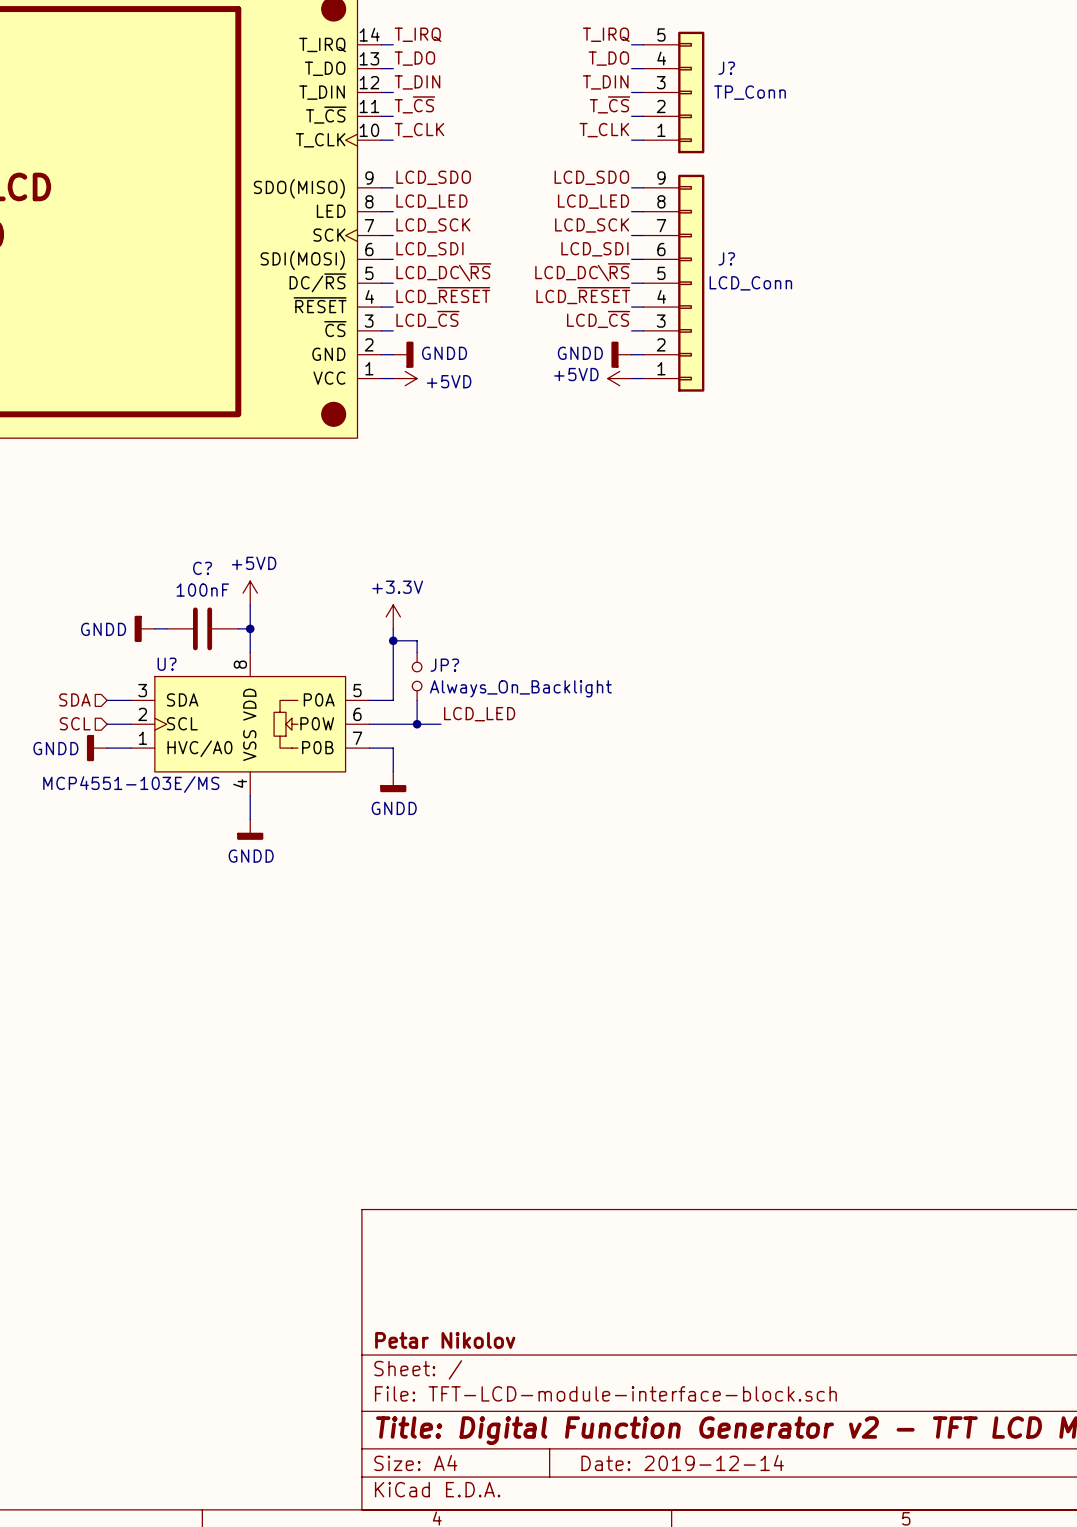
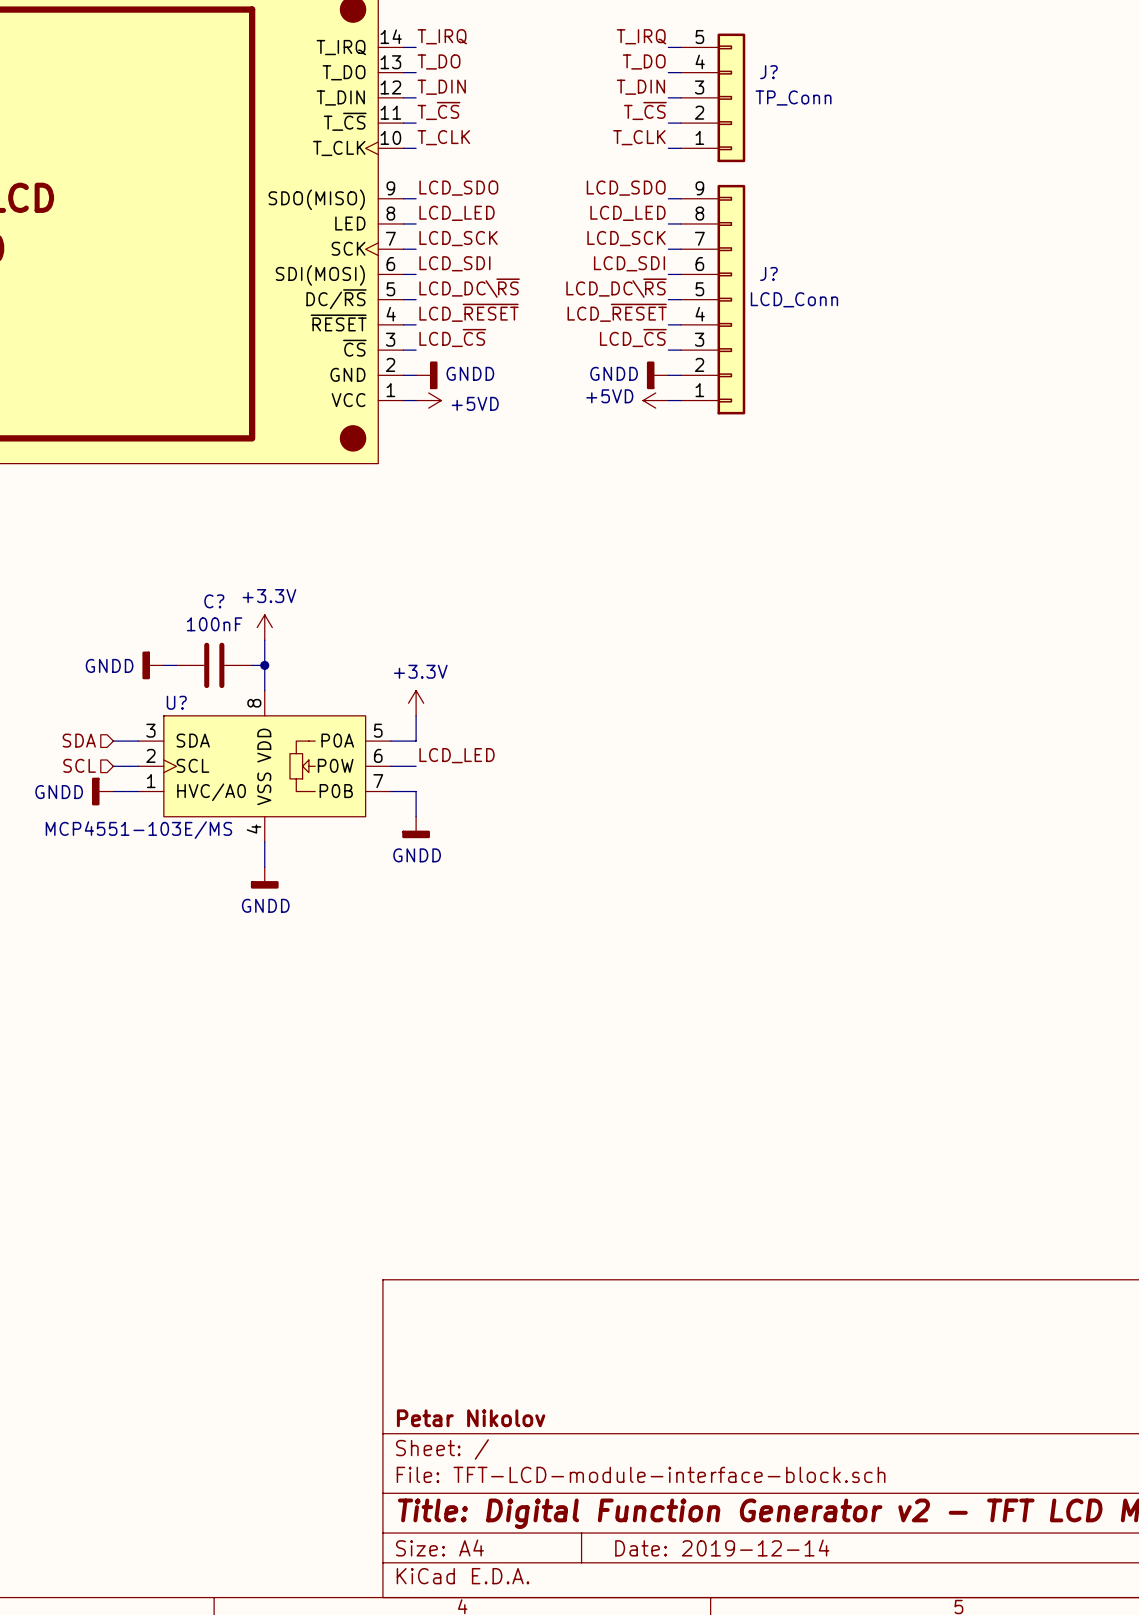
power symbol: +5VD (250, 593) -> +3.3V (264, 627)
power symbol position: +3.3V (393, 616) -> +3.3V (416, 703)
wire: (393, 640) (417, 640) (417, 652) -> none
junction: (393, 640) -> none
JP?: Always_On_Backlight (417, 676) -> none
wire: (417, 700) (417, 724) -> none
label position: LCD_LED (479, 714) -> LCD_LED (457, 755)
wire: (393, 724) (440, 724) -> none
junction: (417, 724) -> none

